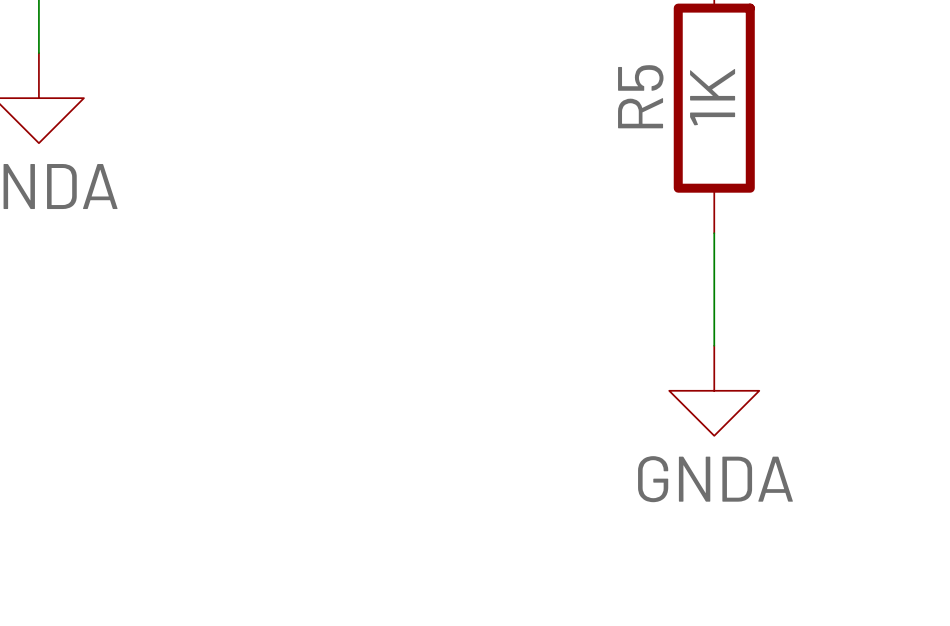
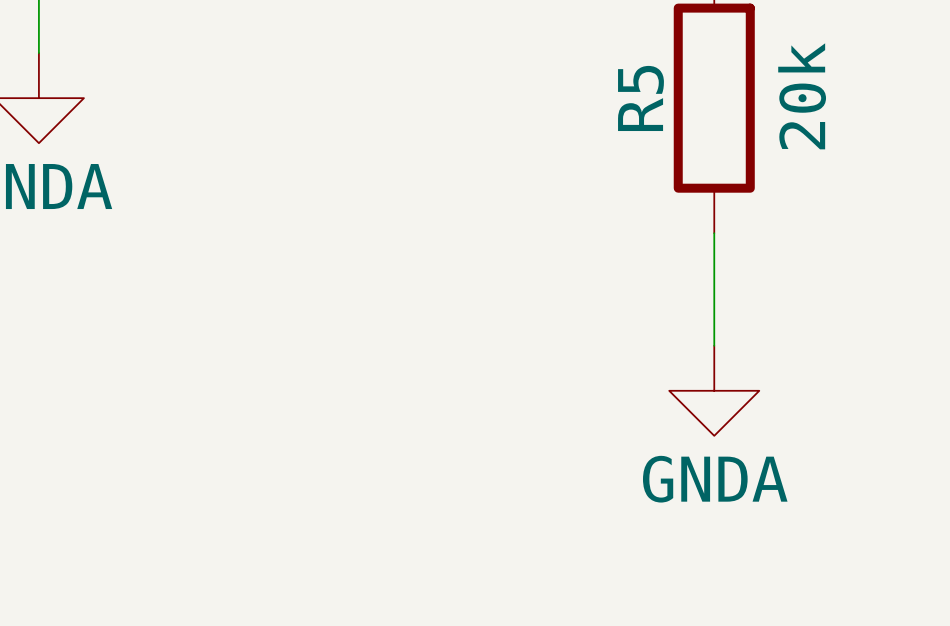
R5 value: 1K (712, 97) -> 20k (802, 96)

